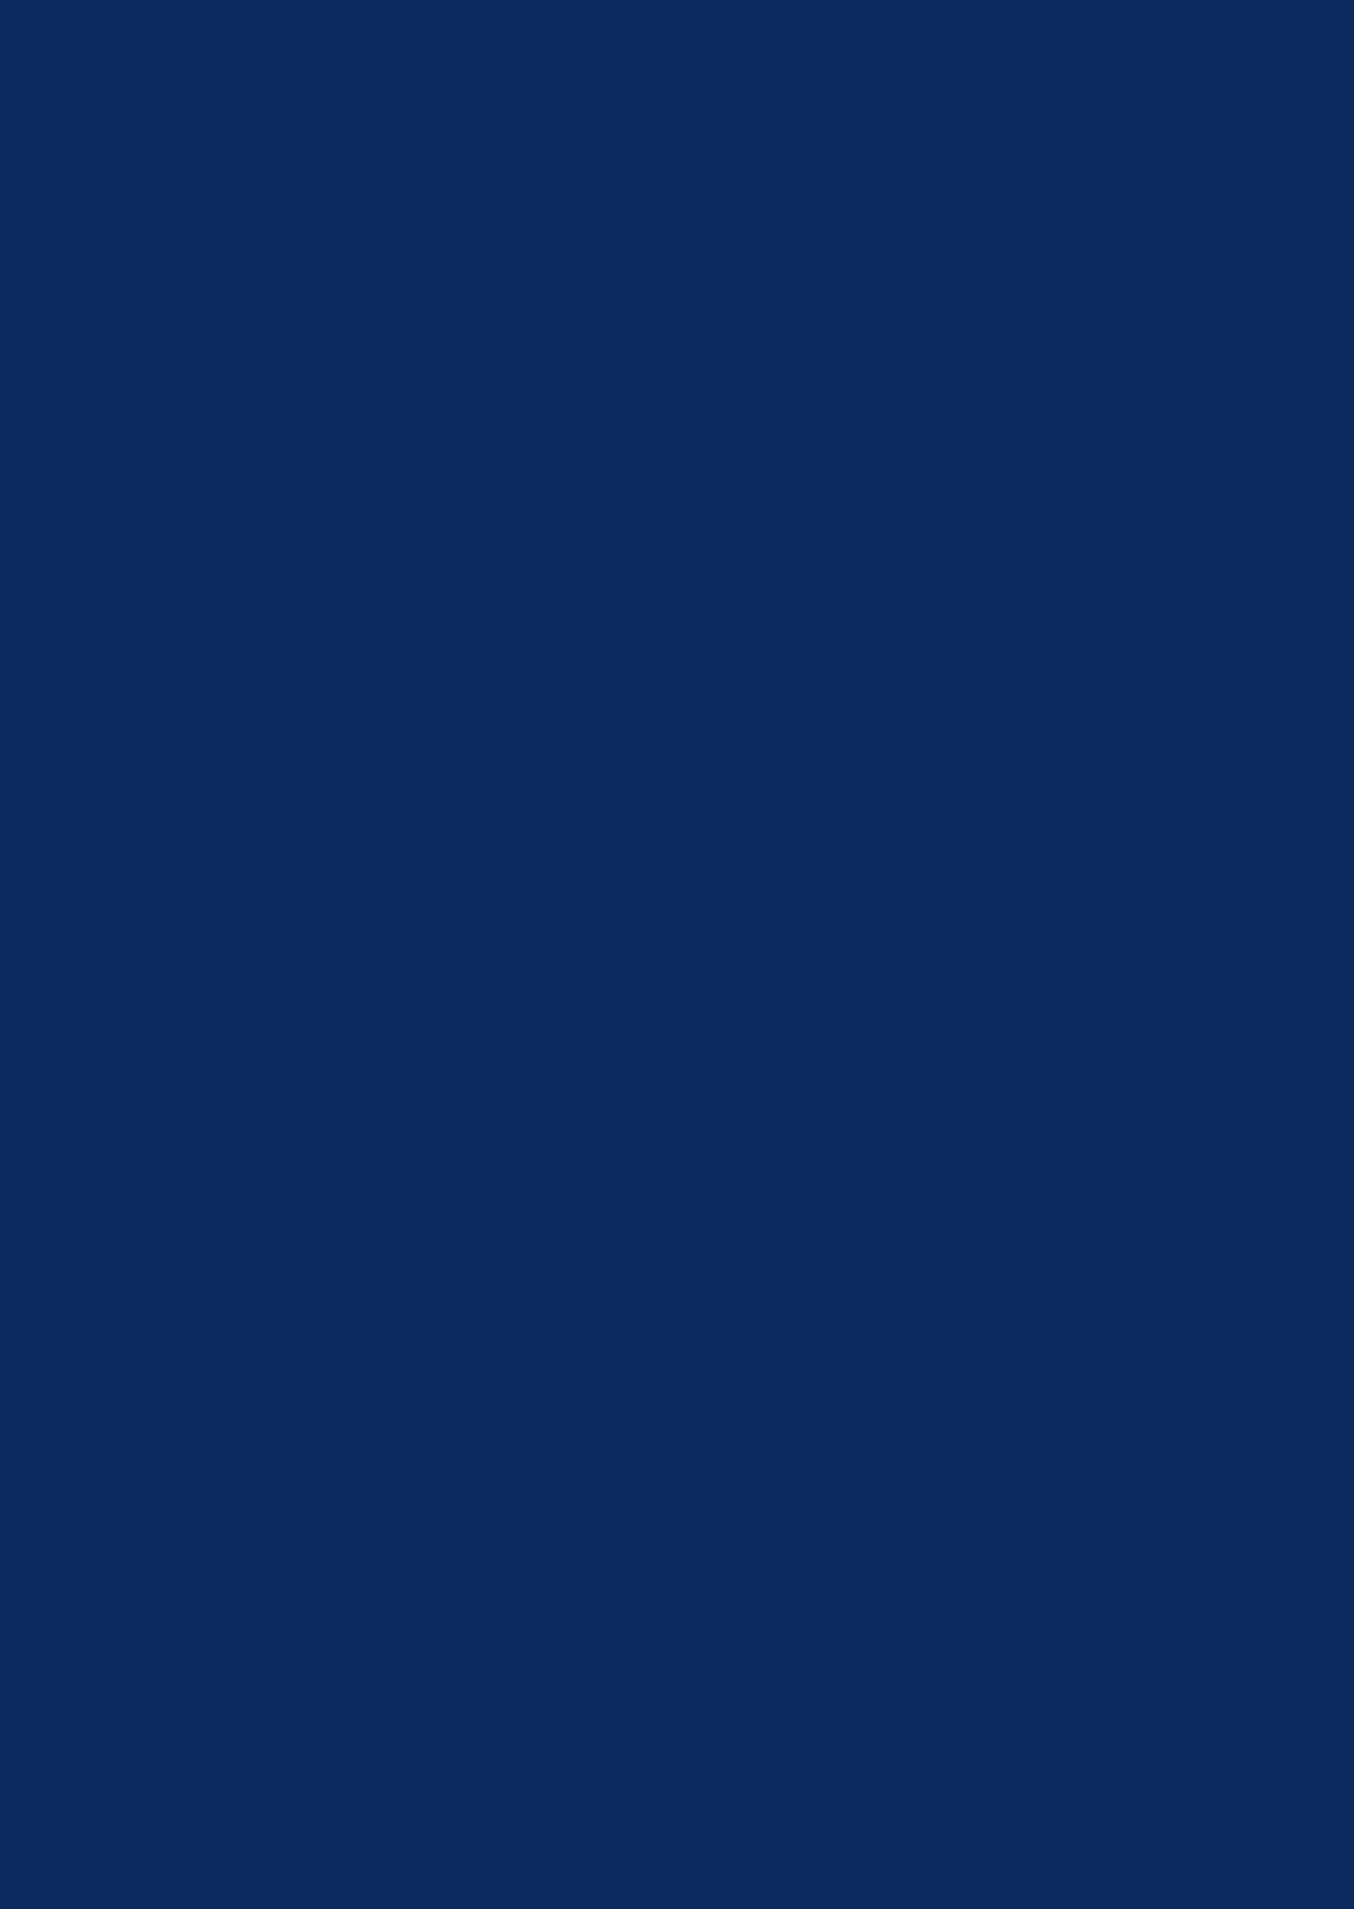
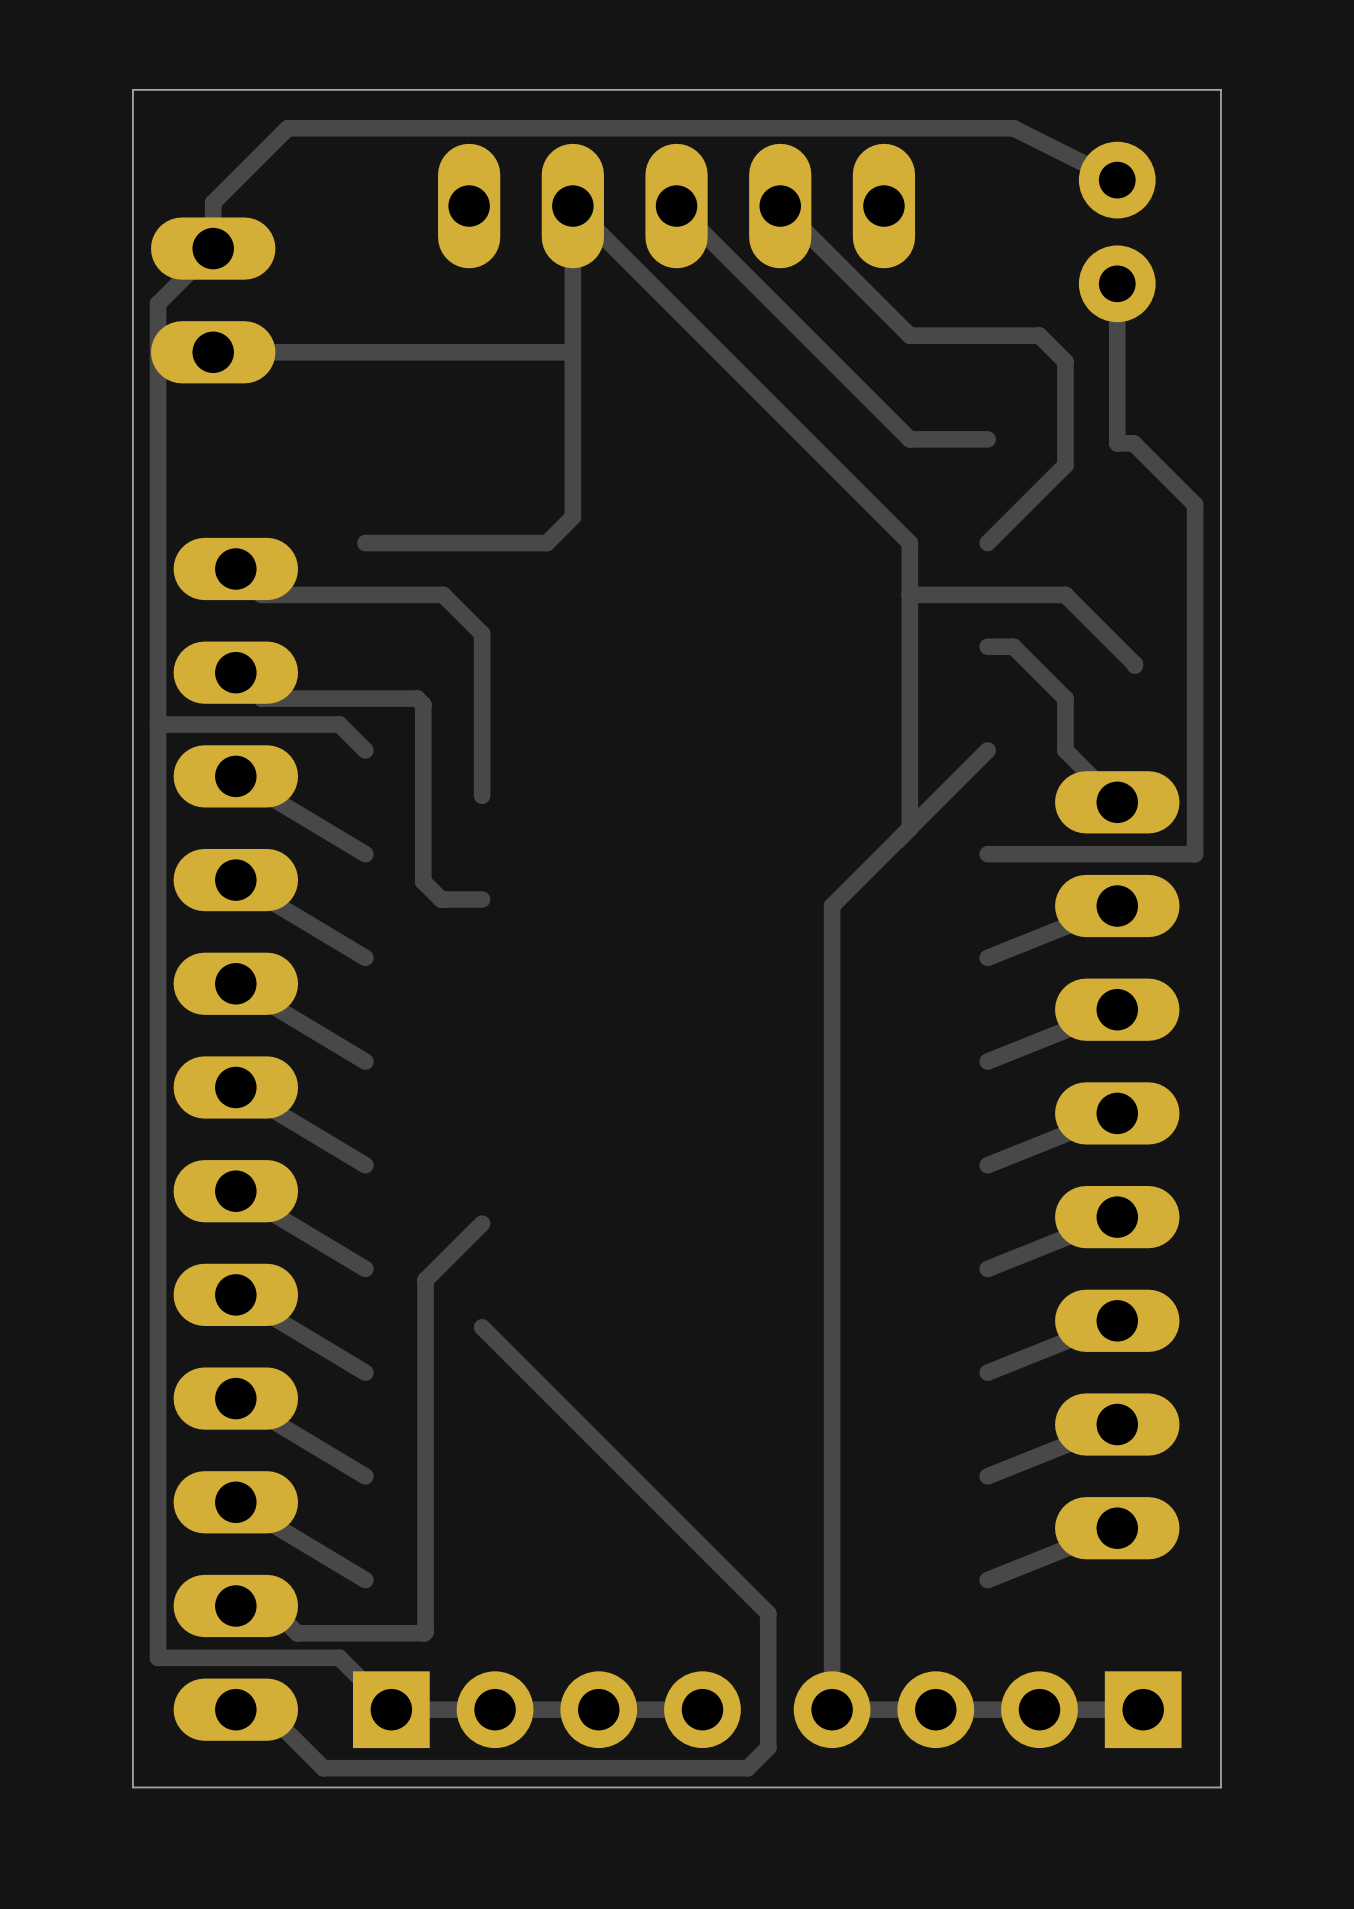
board edge: none -> (1220, 89) (132, 89) (132, 1787) (1220, 1787) (1220, 89)
track: none -> (1117, 180) (1013, 128) (287, 128) (213, 202) (213, 248) (158, 303) (158, 1657) (339, 1657) (391, 1709) (702, 1709)
track: none -> (676, 206) (909, 439) (987, 439)
part: none -> (676, 206)
track: none -> (780, 206) (909, 335) (1039, 335) (1065, 361) (1065, 465) (987, 543)
part: none -> (1117, 231)
track: none -> (1117, 283) (1117, 443) (1133, 443) (1195, 504) (1195, 854) (987, 854)
part: none -> (213, 300)
track: none -> (572, 352) (213, 352)
track: none -> (365, 543) (546, 543) (572, 517) (572, 206) (909, 543) (909, 828)
track: none -> (235, 568) (261, 594) (443, 594) (482, 633) (482, 795)
track: none -> (909, 594) (1065, 594) (1134, 665)
track: none -> (987, 646) (1013, 646) (1065, 698) (1065, 750) (1117, 802)
track: none -> (235, 672) (261, 698) (417, 698) (423, 704) (423, 881) (441, 899) (482, 899)
track: none -> (158, 724) (339, 724) (365, 750)
track: none -> (987, 750) (832, 906) (832, 1709) (1143, 1709)
track: none -> (235, 776) (365, 854)
track: none -> (235, 880) (365, 957)
track: none -> (1117, 906) (987, 957)
track: none -> (235, 983) (365, 1061)
track: none -> (1117, 1009) (987, 1061)
track: none -> (235, 1087) (365, 1165)
track: none -> (1117, 1113) (987, 1165)
part: none -> (235, 1139)
part: none -> (1117, 1165)
track: none -> (235, 1191) (365, 1268)
track: none -> (1117, 1217) (987, 1268)
track: none -> (482, 1223) (425, 1280) (425, 1632) (297, 1633) (270, 1605) (235, 1605)
track: none -> (235, 1294) (365, 1372)
track: none -> (1117, 1320) (987, 1372)
track: none -> (482, 1327) (768, 1613) (768, 1747) (747, 1768) (323, 1768) (264, 1709) (235, 1709)
track: none -> (235, 1398) (365, 1476)
track: none -> (1117, 1424) (987, 1476)
track: none -> (235, 1502) (365, 1580)
track: none -> (1117, 1528) (987, 1580)
part: none -> (546, 1709)
part: none -> (987, 1709)

